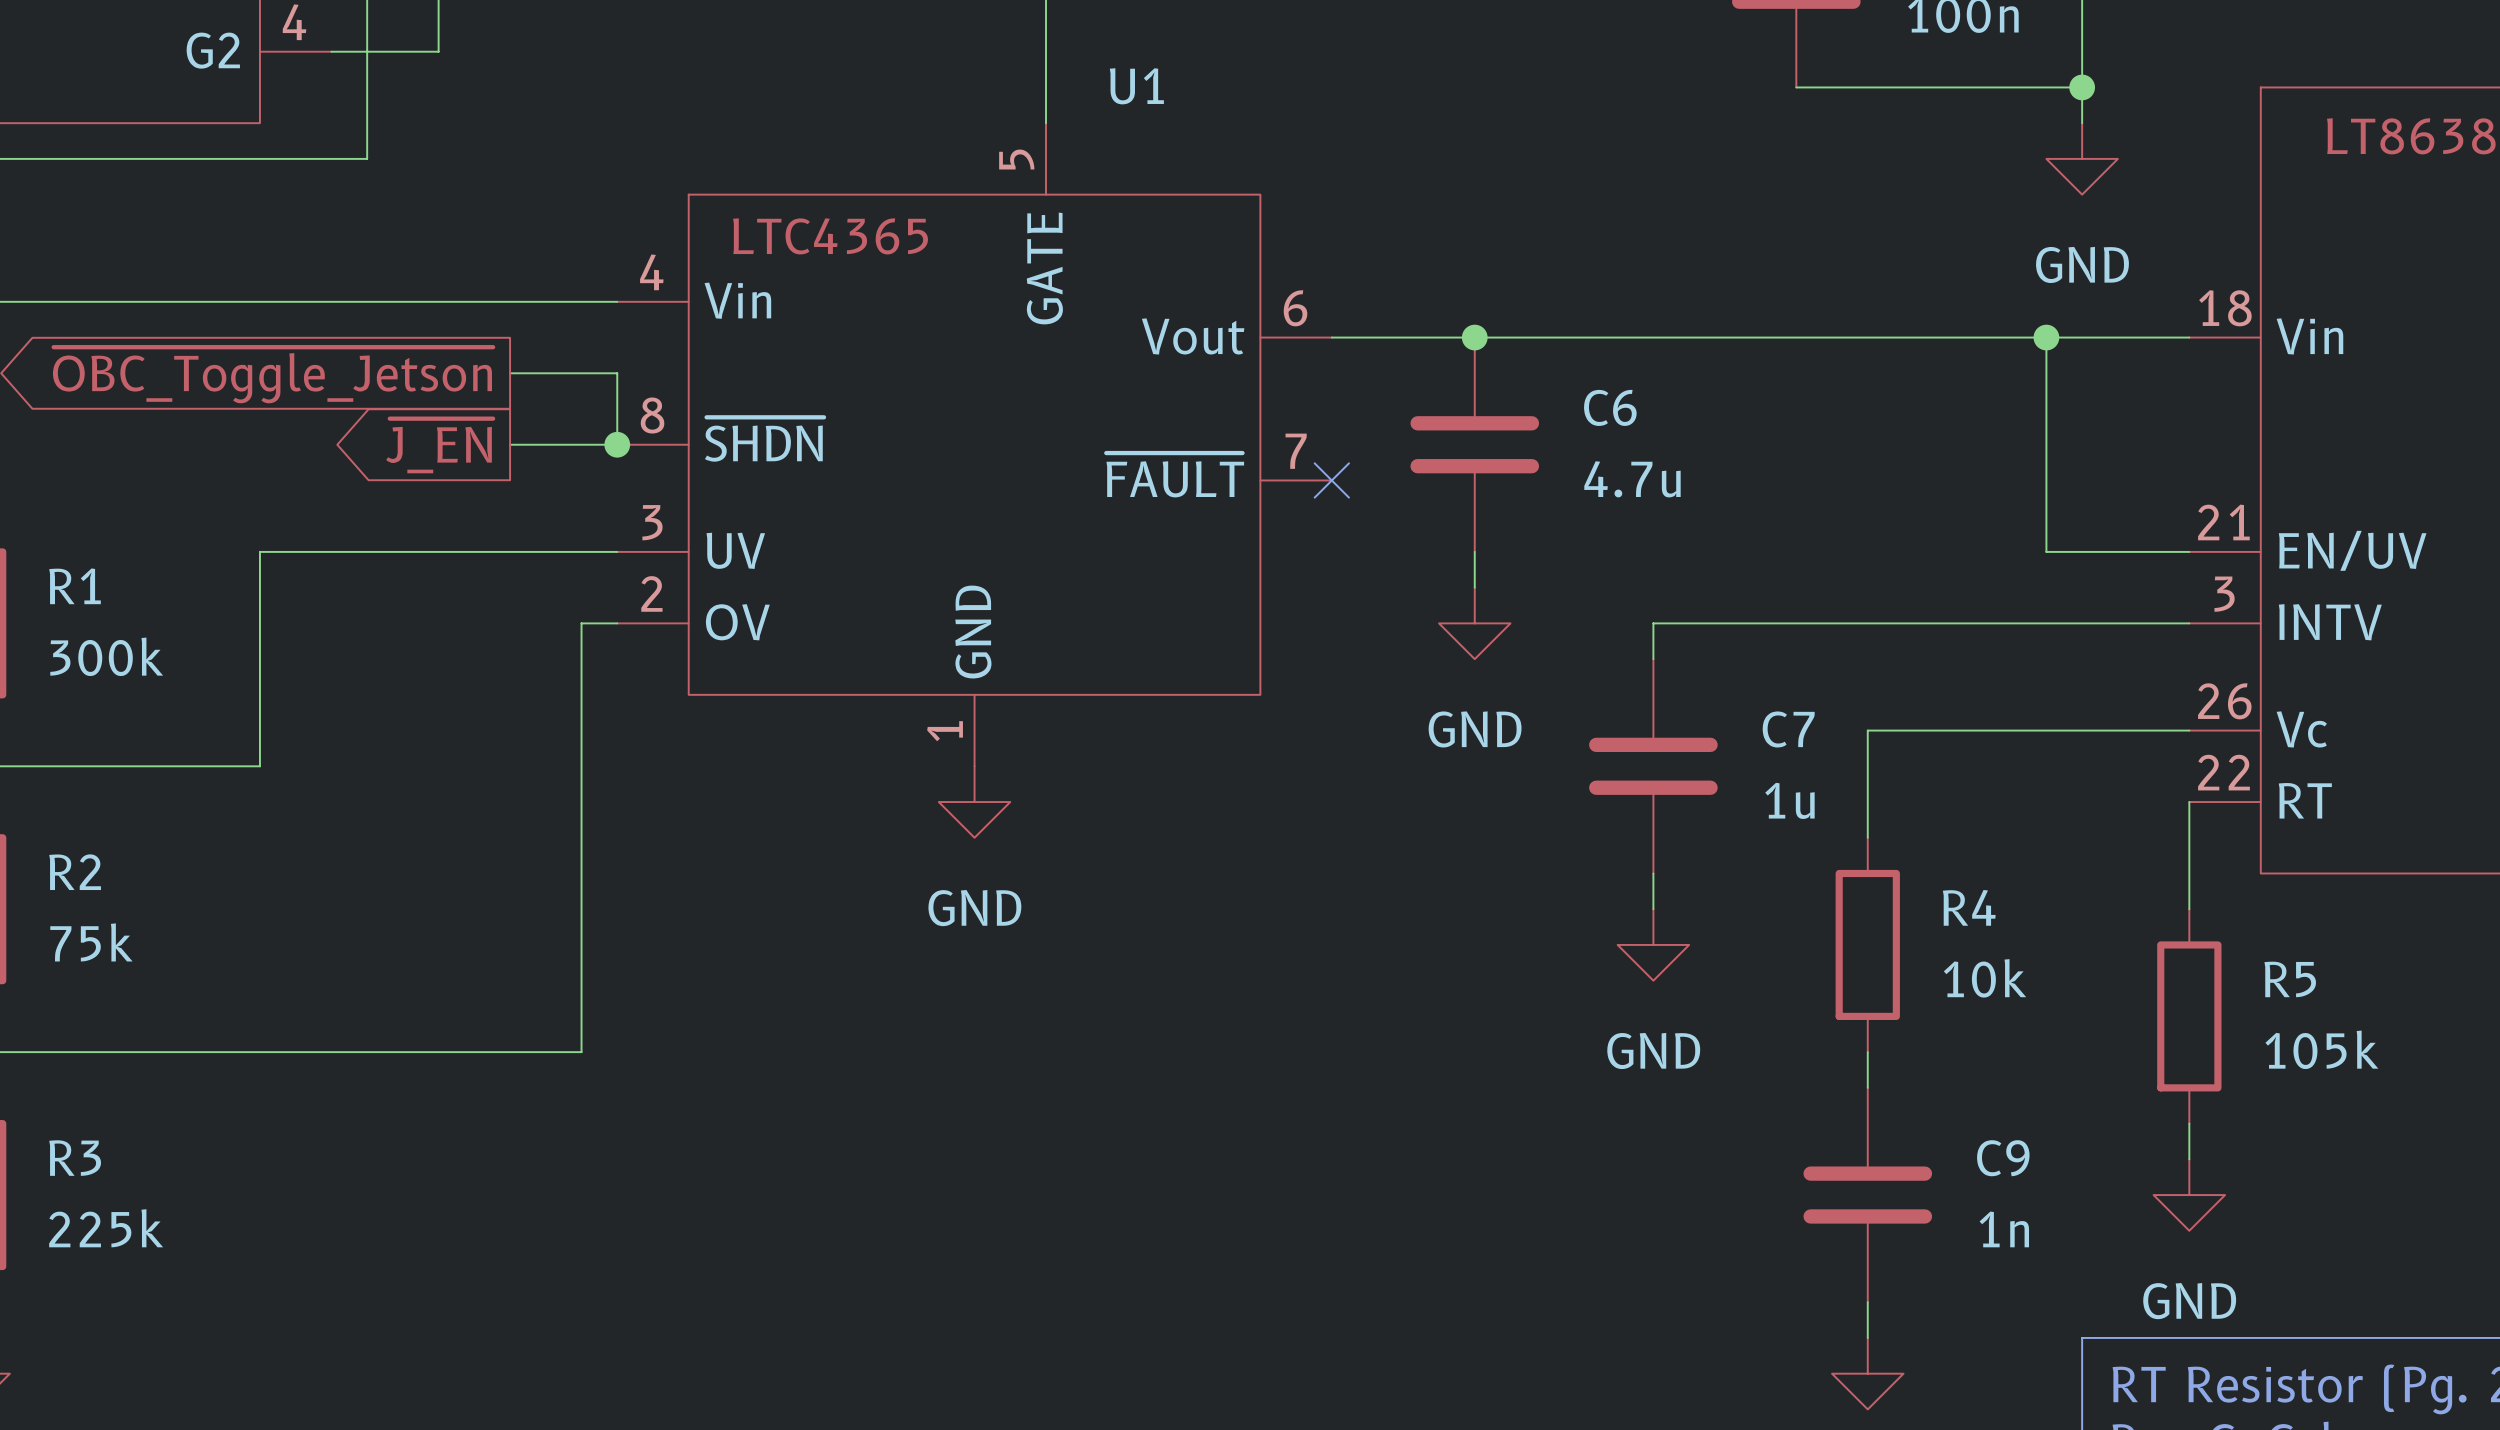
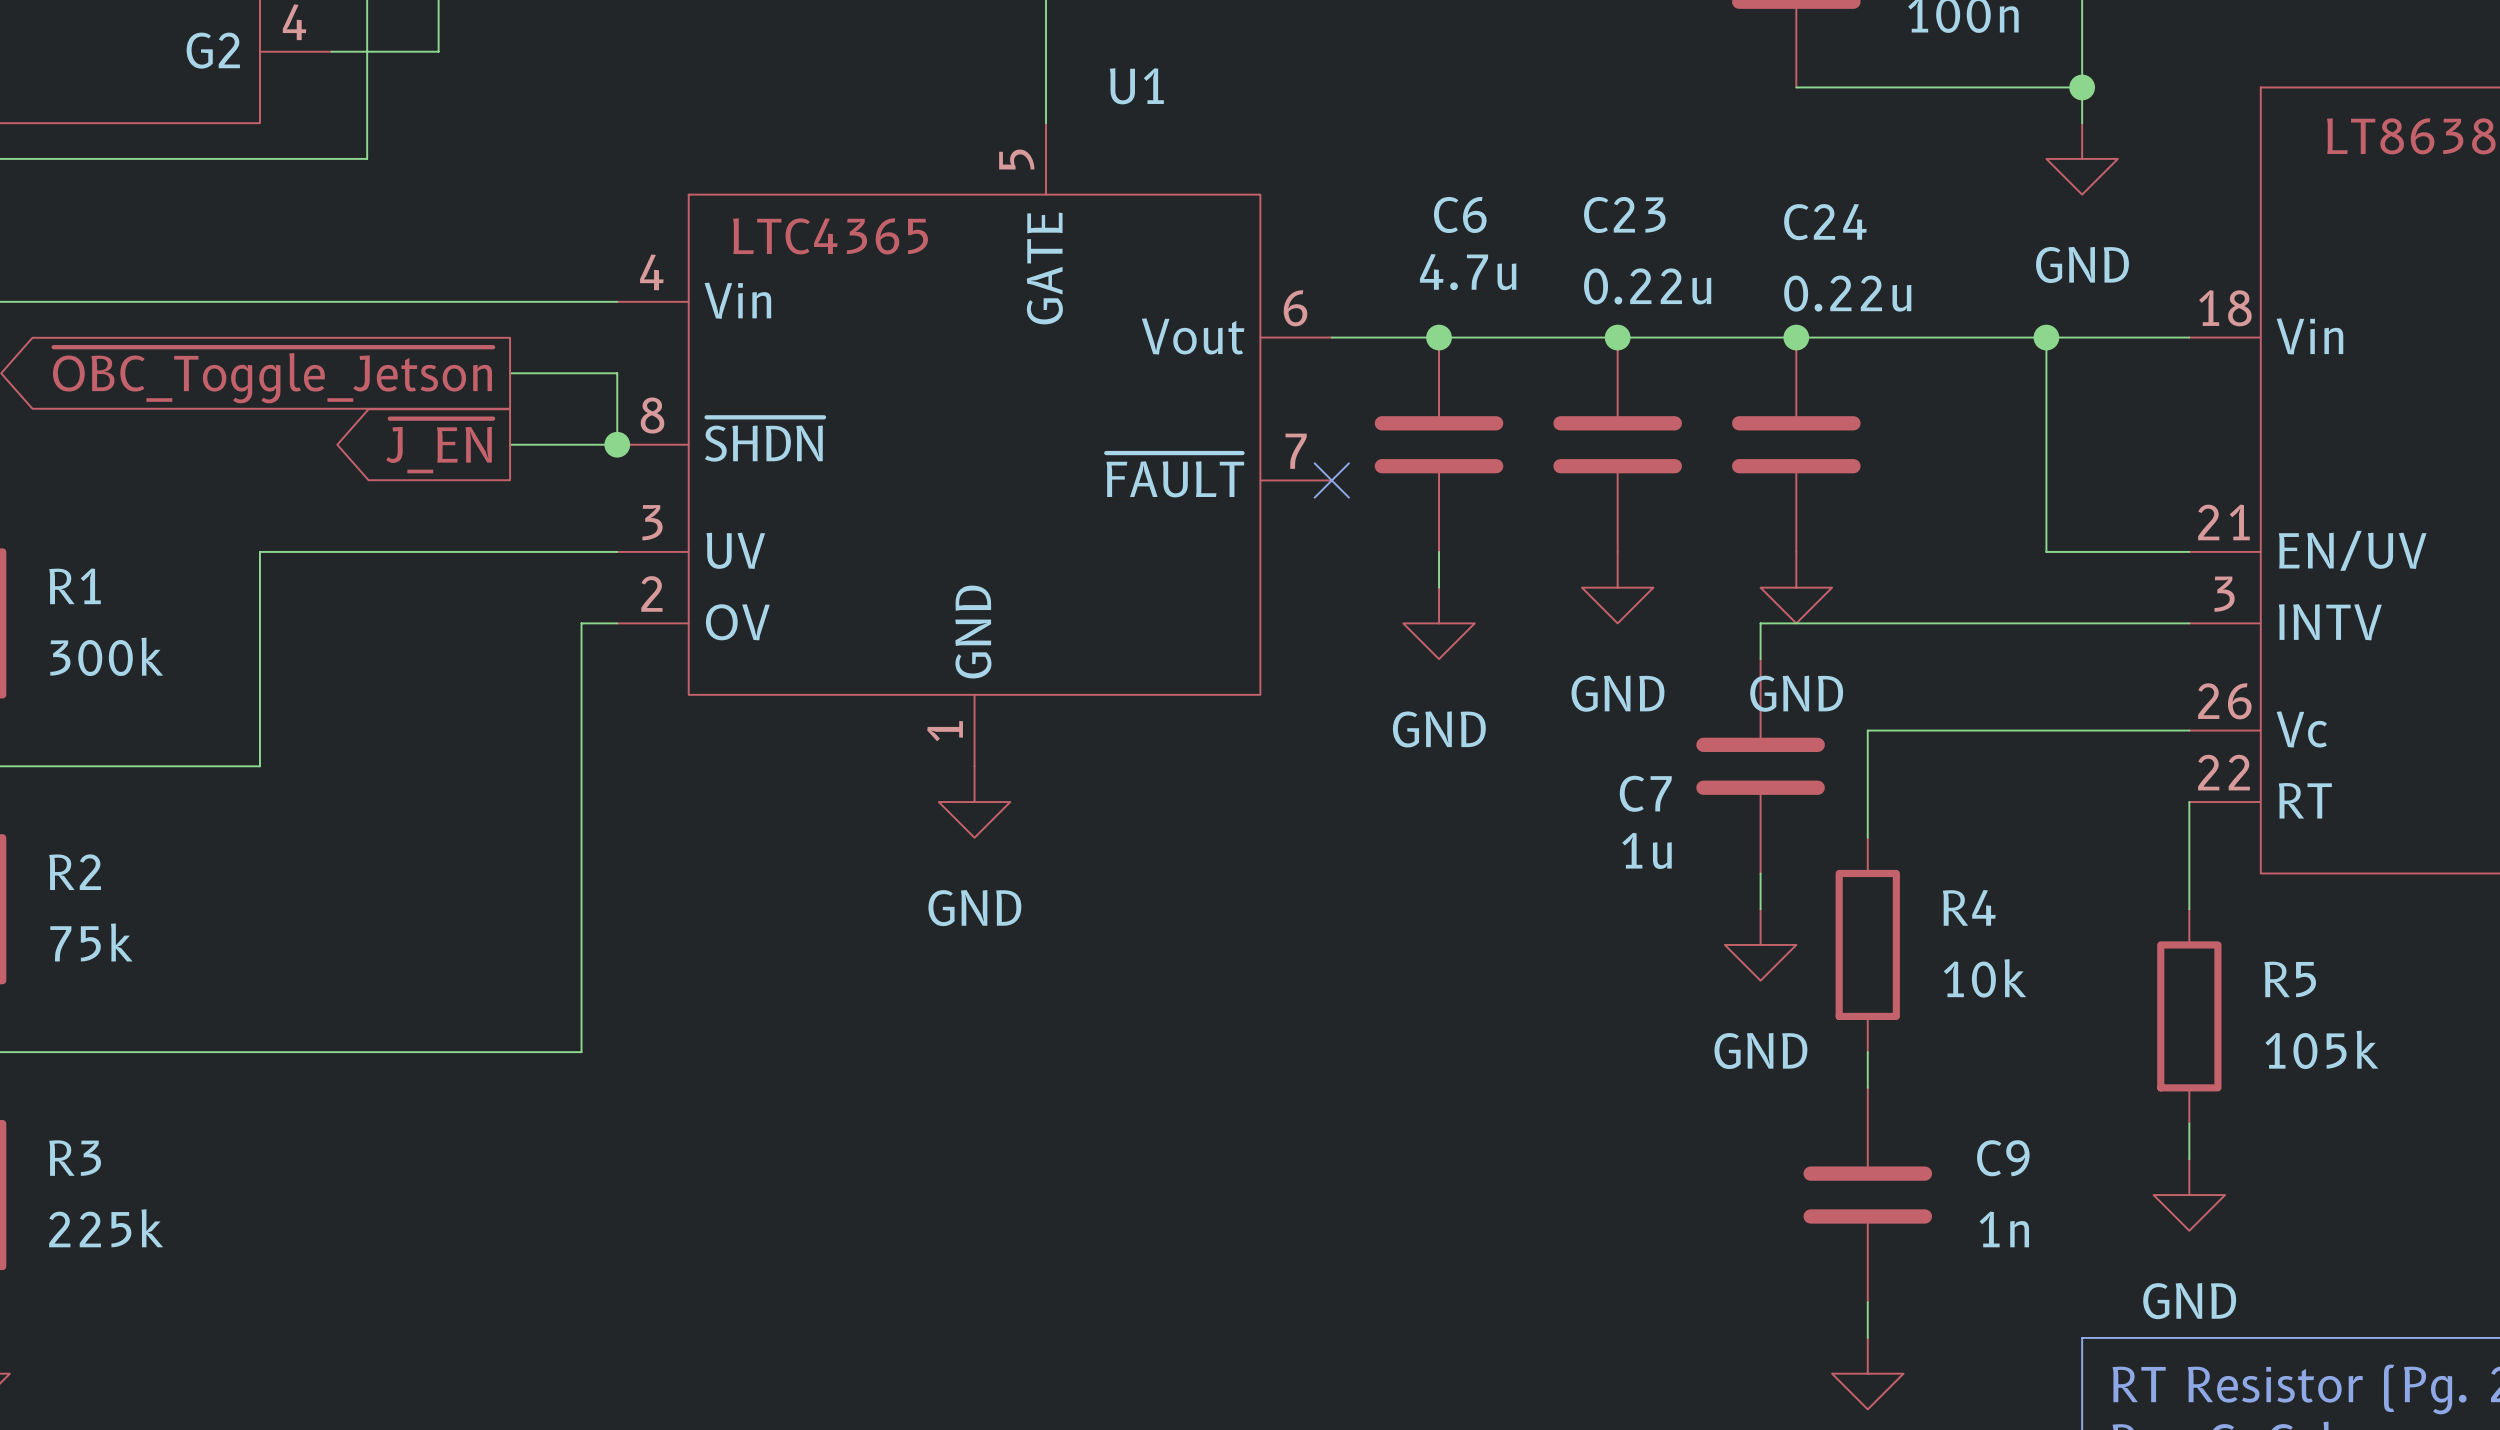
junction position: (1474, 337) -> (1439, 337)
junction: none -> (1617, 337)
junction: none -> (1796, 337)
C6 name position: C6 (1610, 407) -> C6 (1460, 214)
C6 position: (1474, 444) -> (1439, 444)
C23: none -> 0.22u (1617, 444)
C24: none -> 0.22u (1796, 444)
C6 value position: 4.7u (1632, 479) -> 4.7u (1468, 272)
wire: (1474, 551) (1474, 587) -> (1439, 551) (1439, 587)
power symbol: none -> GND (1617, 587)
power symbol: none -> GND (1796, 587)
power symbol position: GND (1474, 623) -> GND (1439, 623)
wire: (1760, 623) (1653, 623) (1653, 659) -> (1760, 623) (1760, 659)
C7 name position: C7 (1788, 729) -> C7 (1645, 793)
C7 position: (1653, 766) -> (1760, 766)
C7 value position: 1u (1789, 800) -> 1u (1647, 850)
wire: (1653, 873) (1653, 909) -> (1760, 873) (1760, 909)
power symbol position: GND (1653, 944) -> GND (1760, 944)

